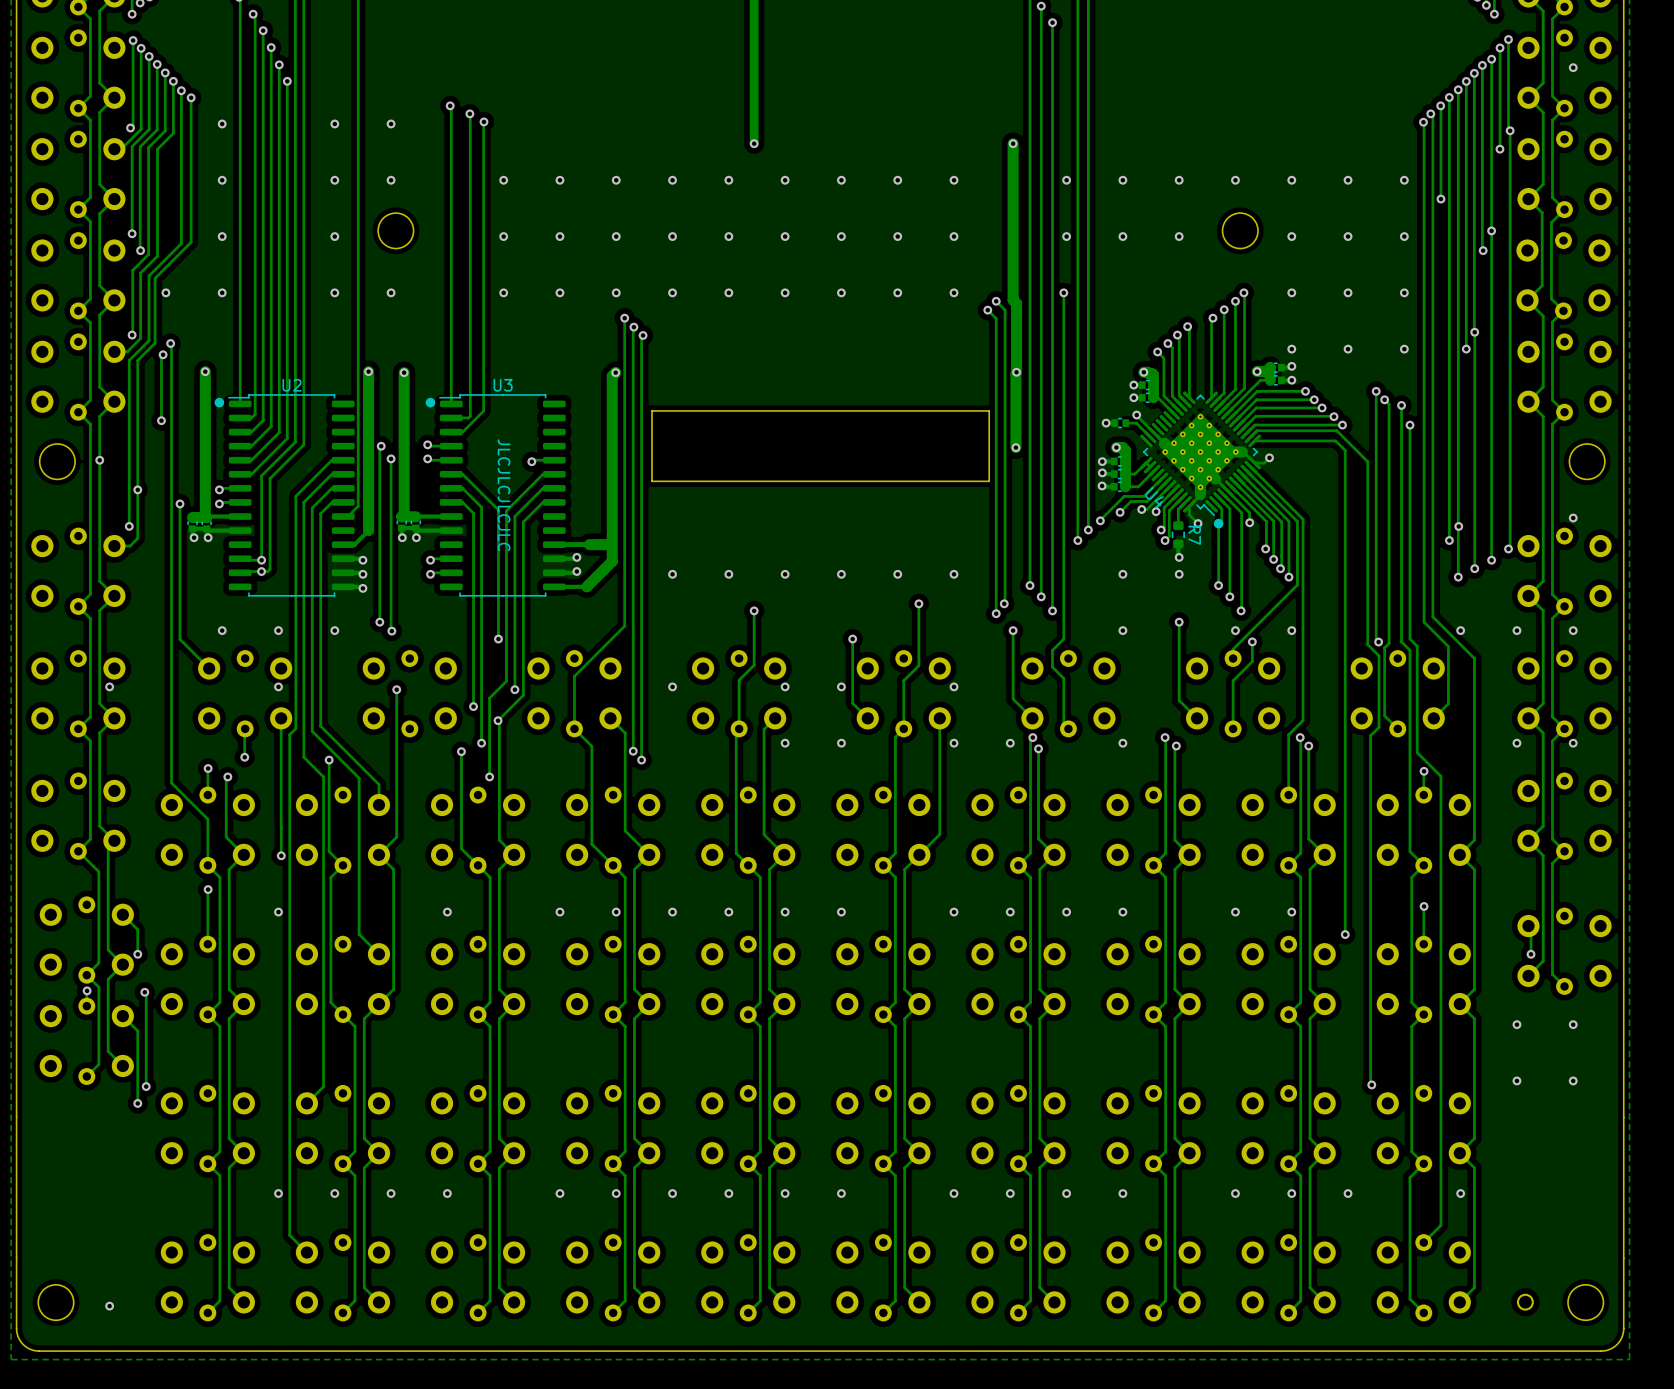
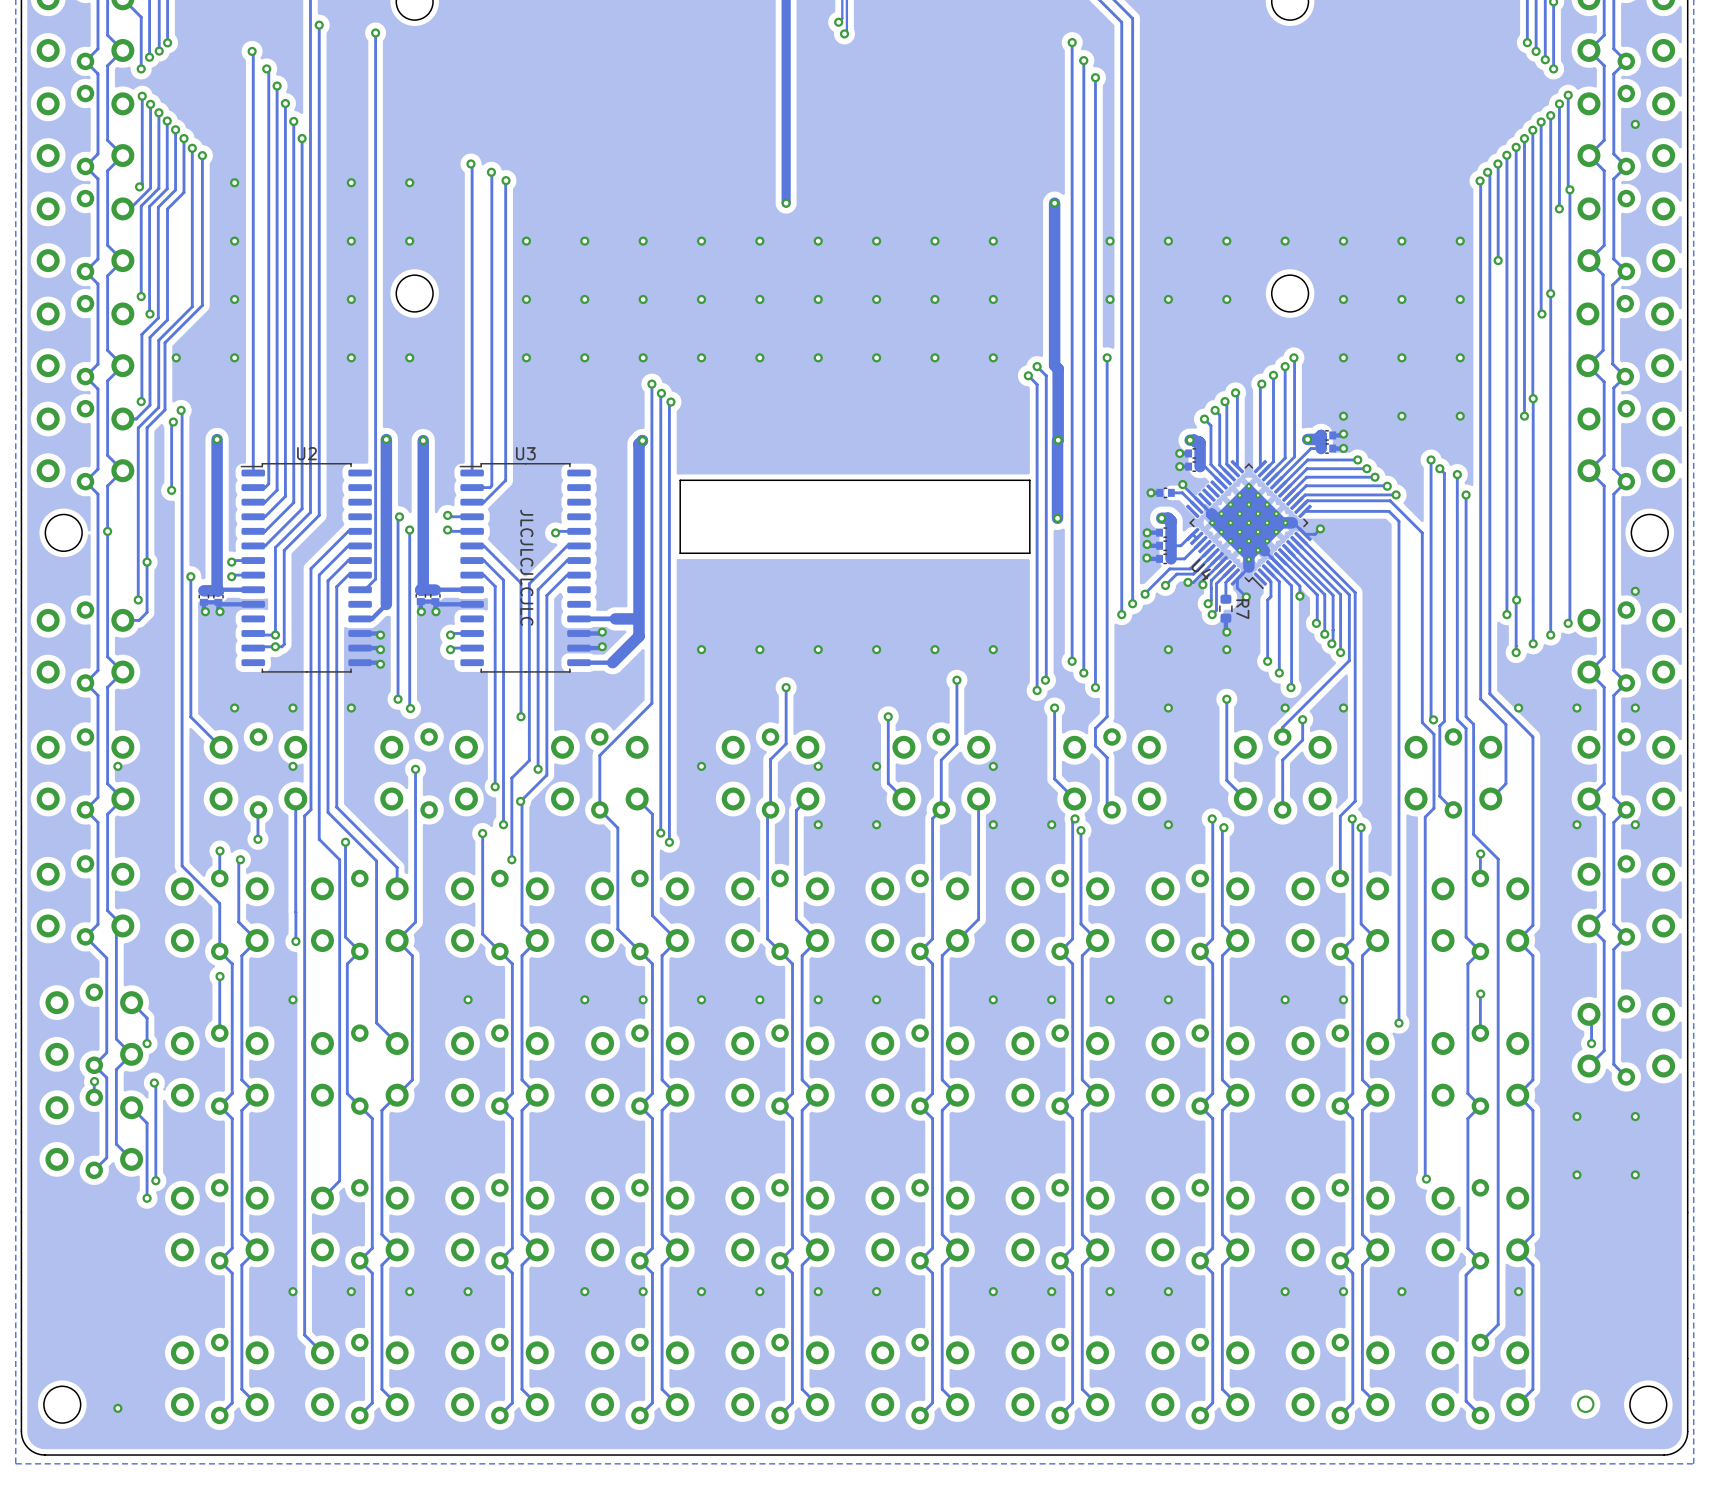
drawing: [214, 397, 225, 408] -> none
drawing: [425, 397, 436, 408] -> none
drawing: [1213, 518, 1224, 529] -> none

